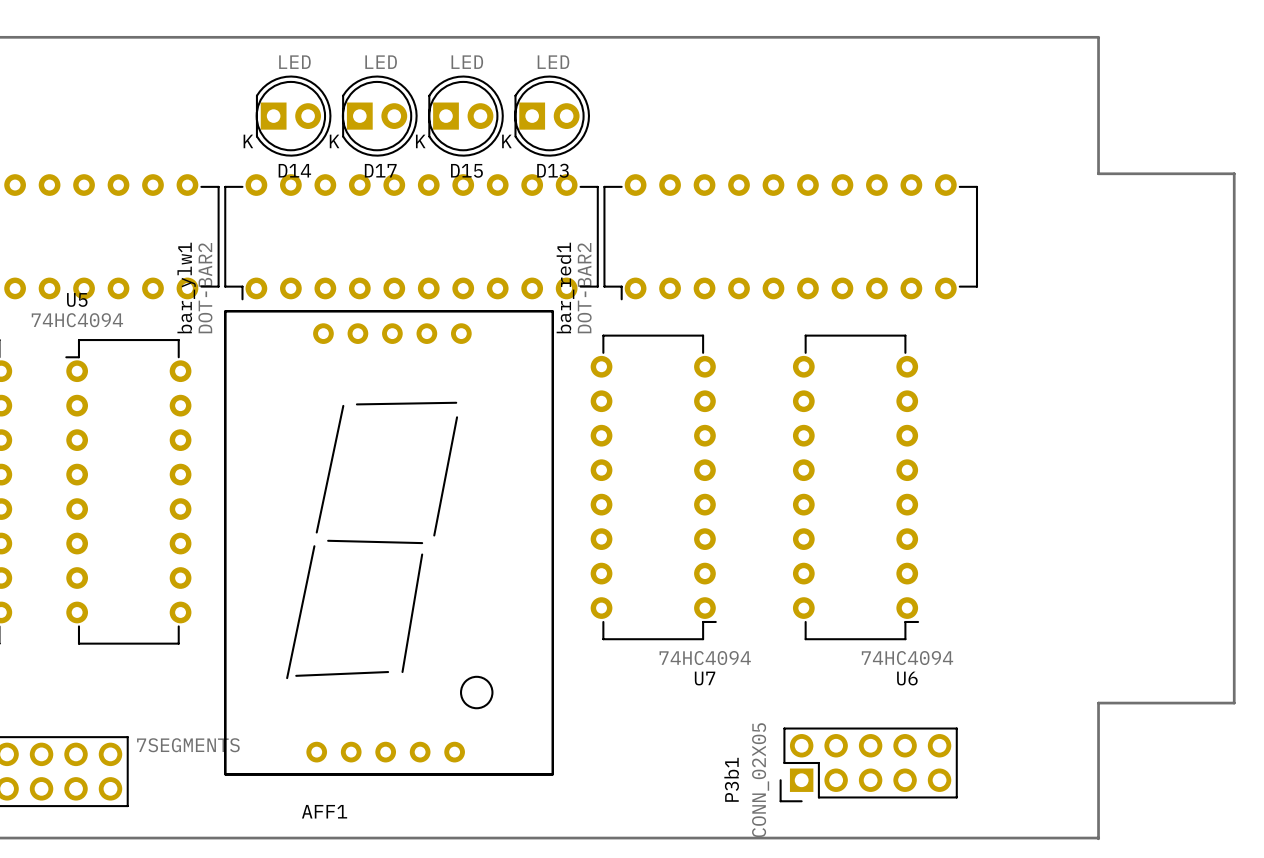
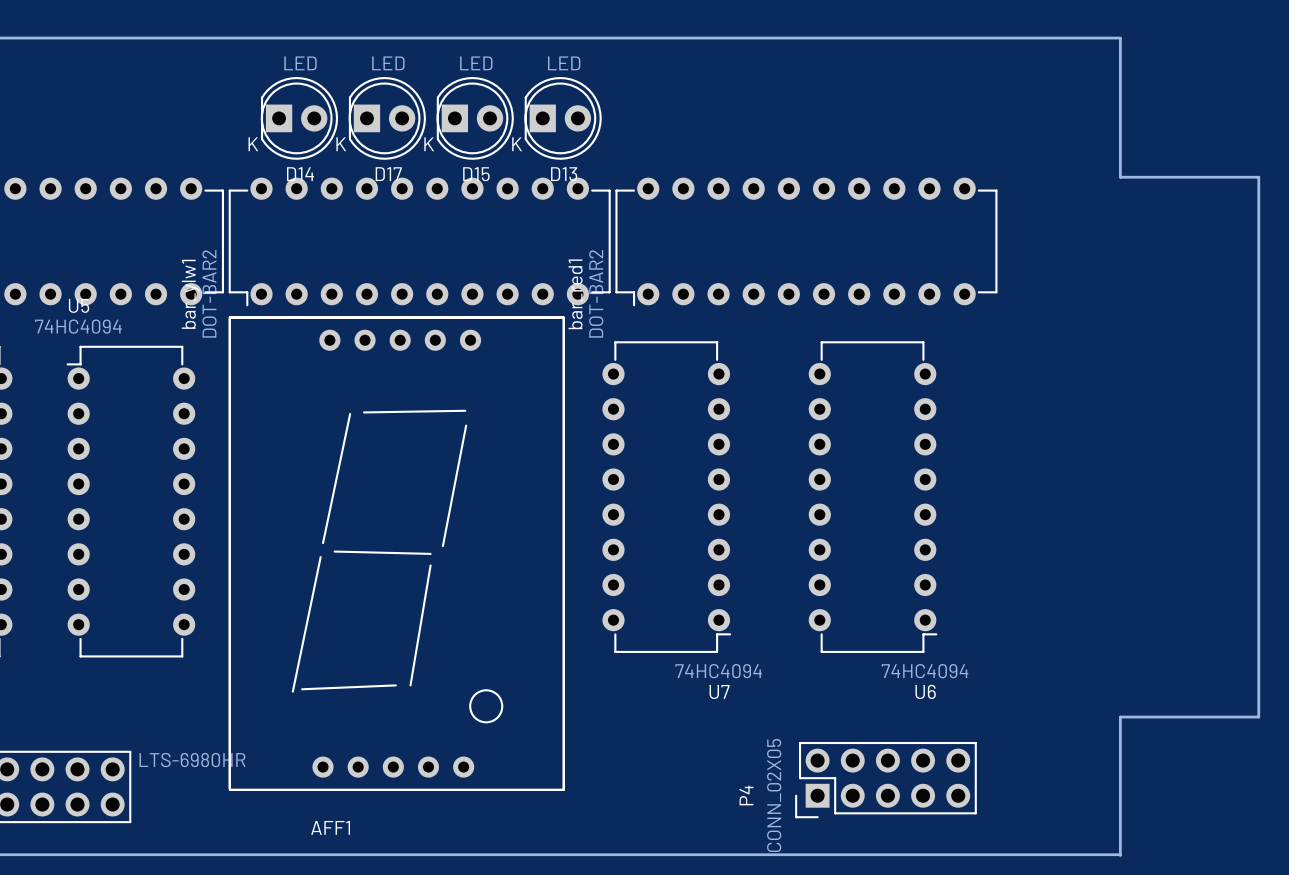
AFF1 value: 7SEGMENTS (188, 745) -> LTS-6980HR (192, 760)
P3b1 name: P3b1 (731, 779) -> P4 (746, 795)

